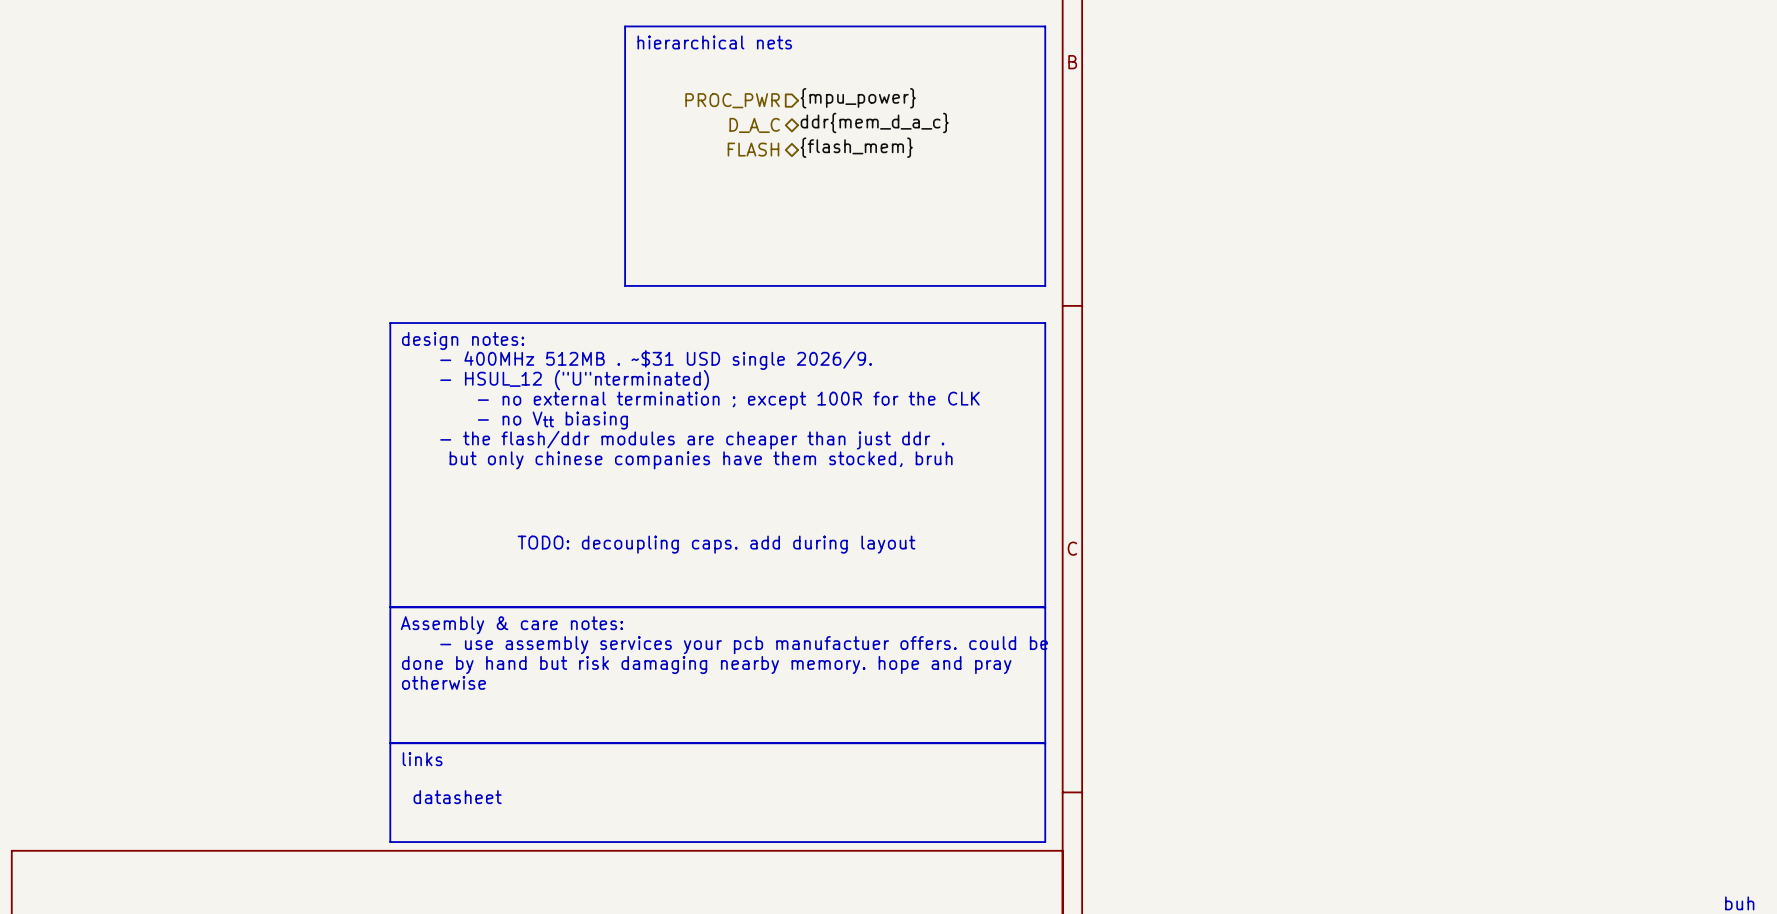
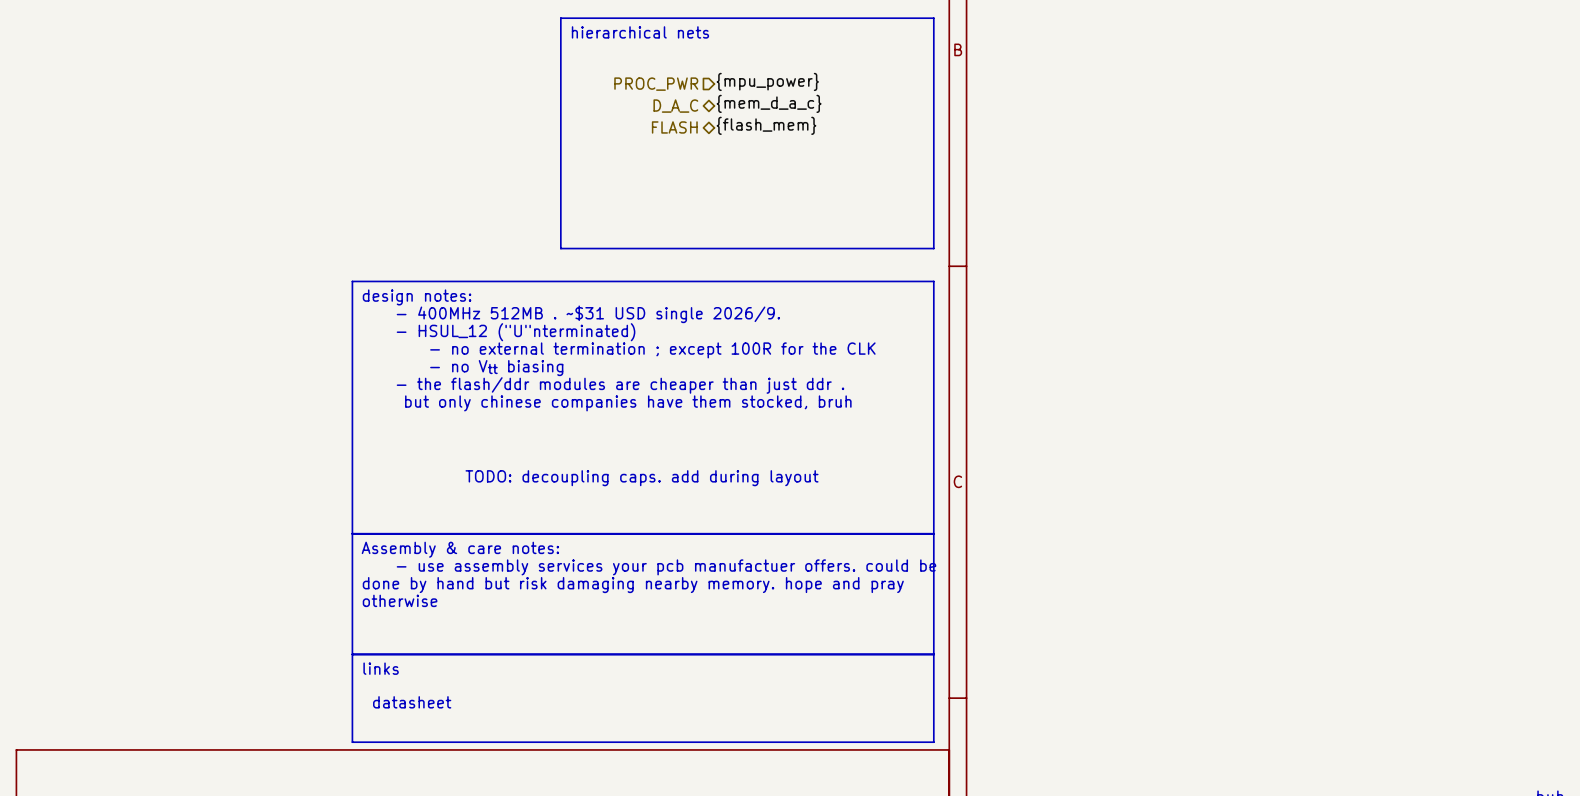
label: ddr{mem_d_a_c} (874, 122) -> {mem_d_a_c} (769, 103)

